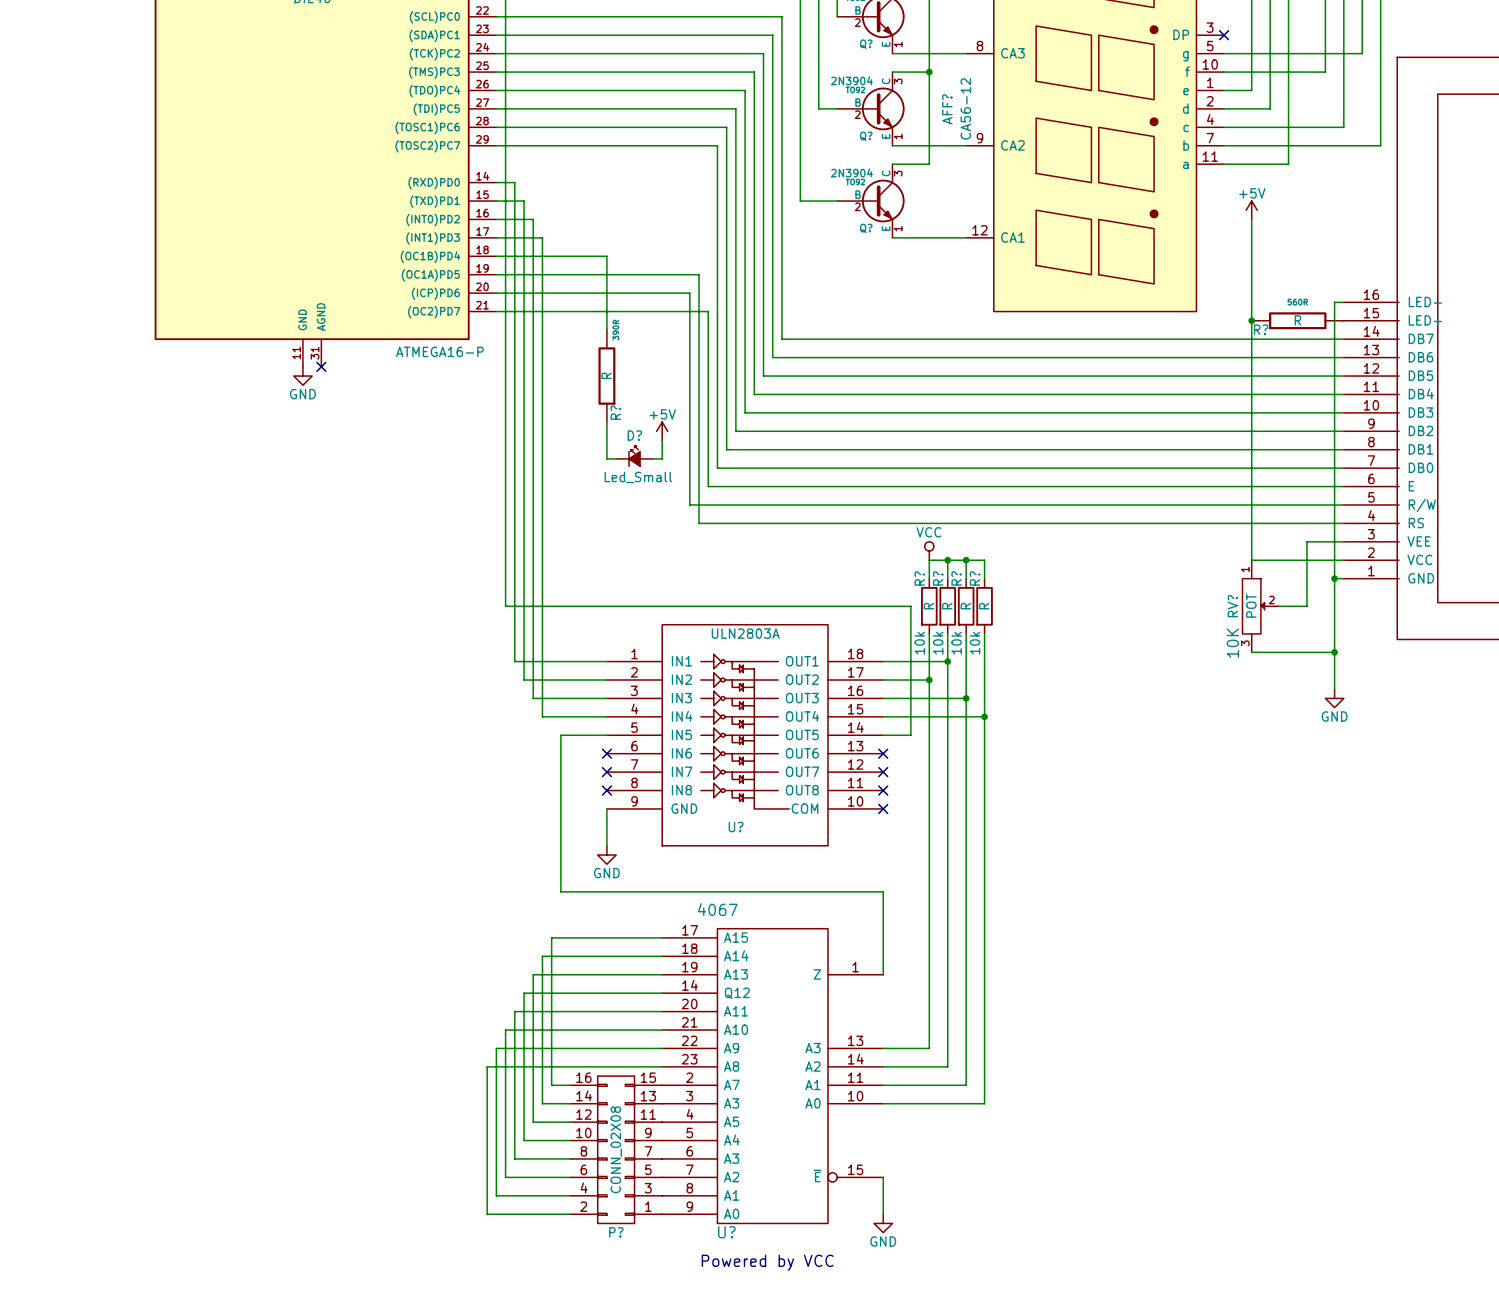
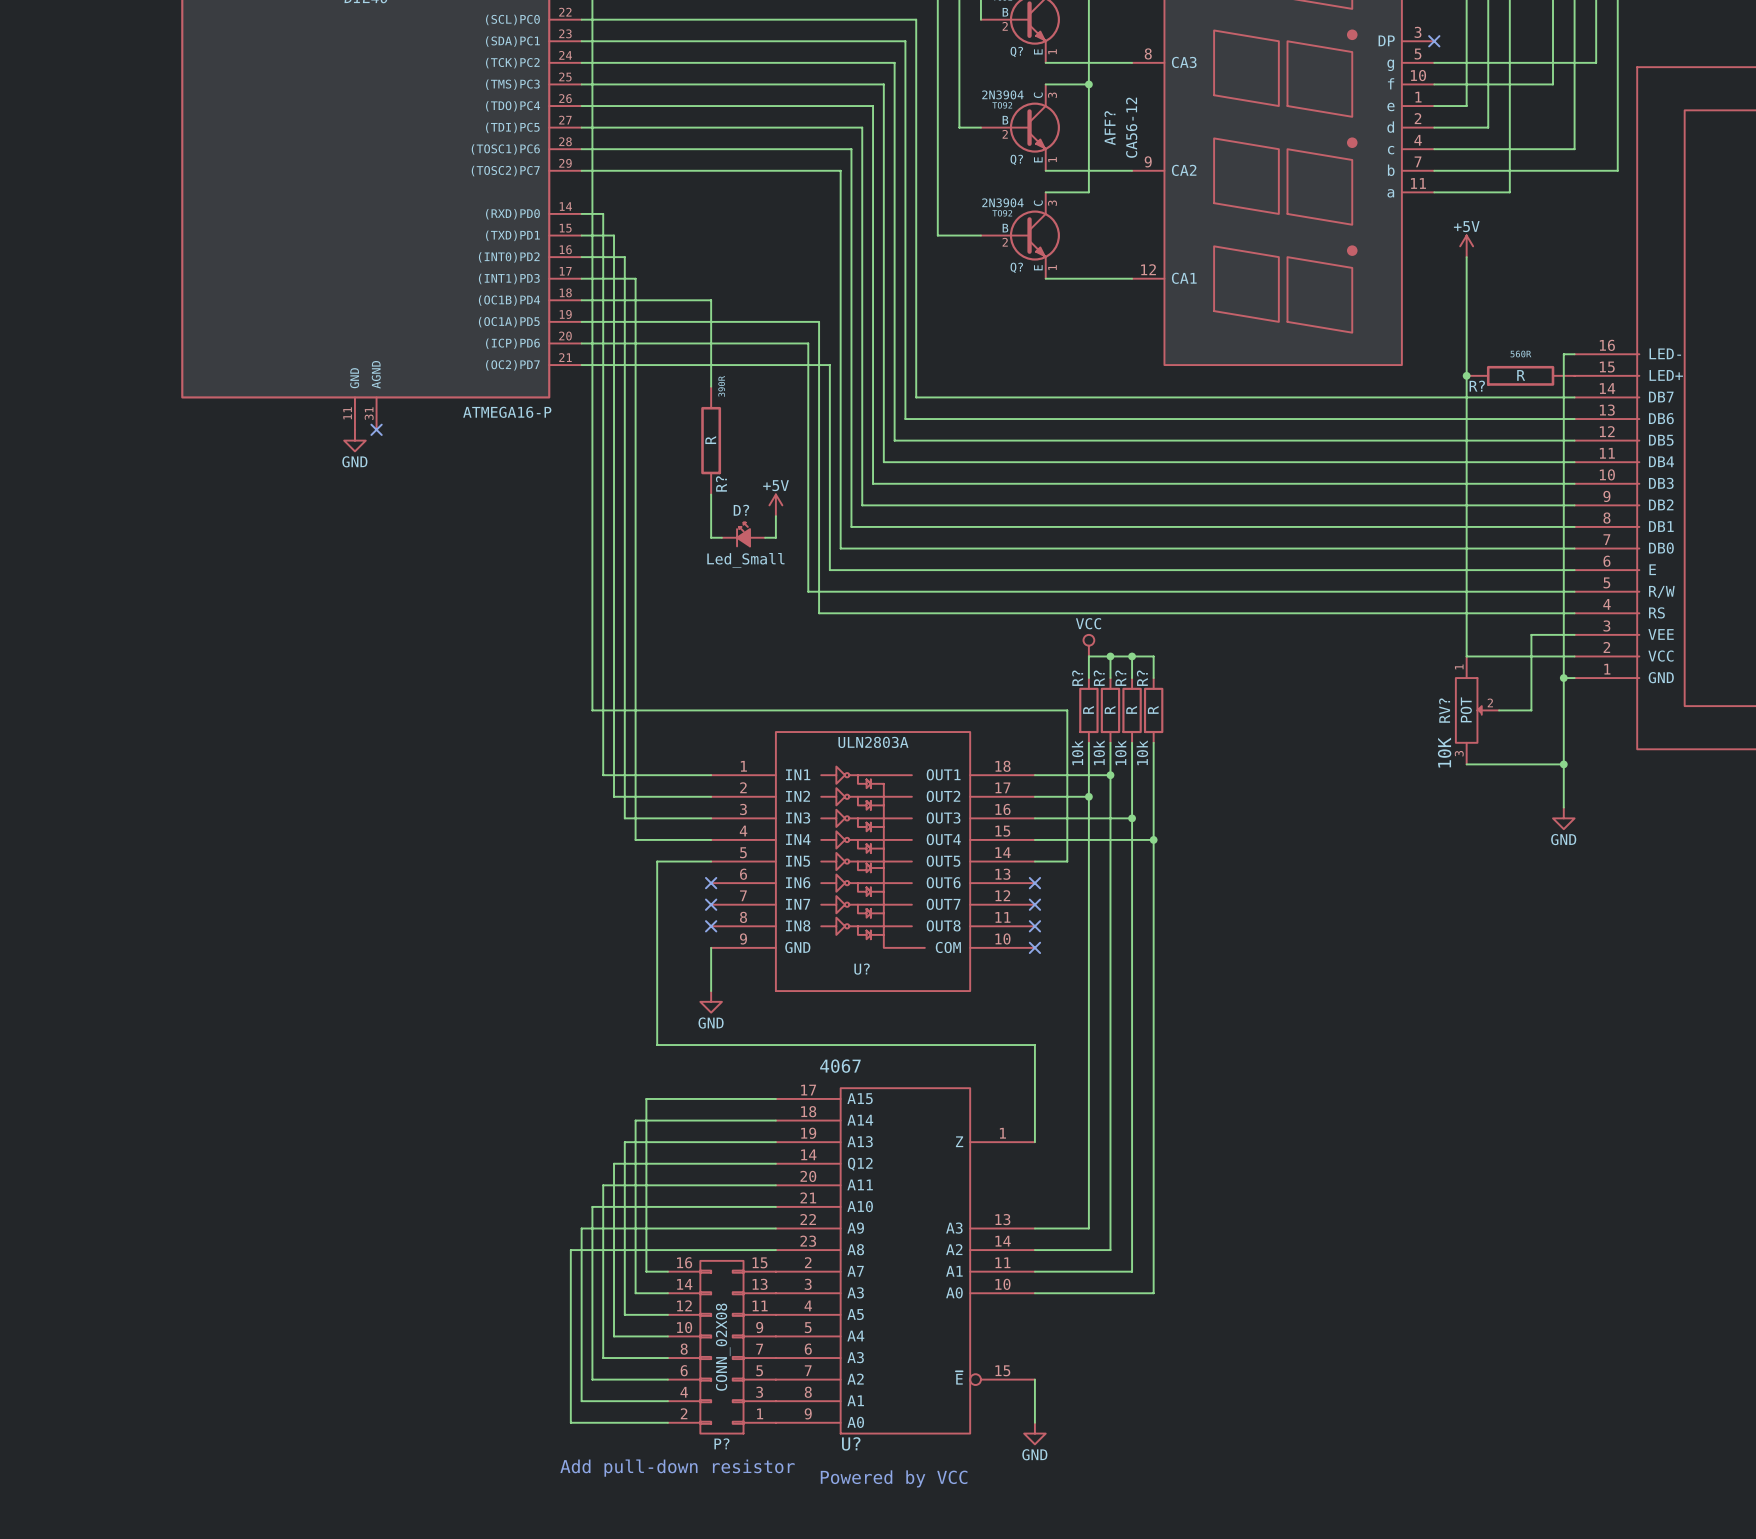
text: none -> Add pull-down resistor (677, 1468)

